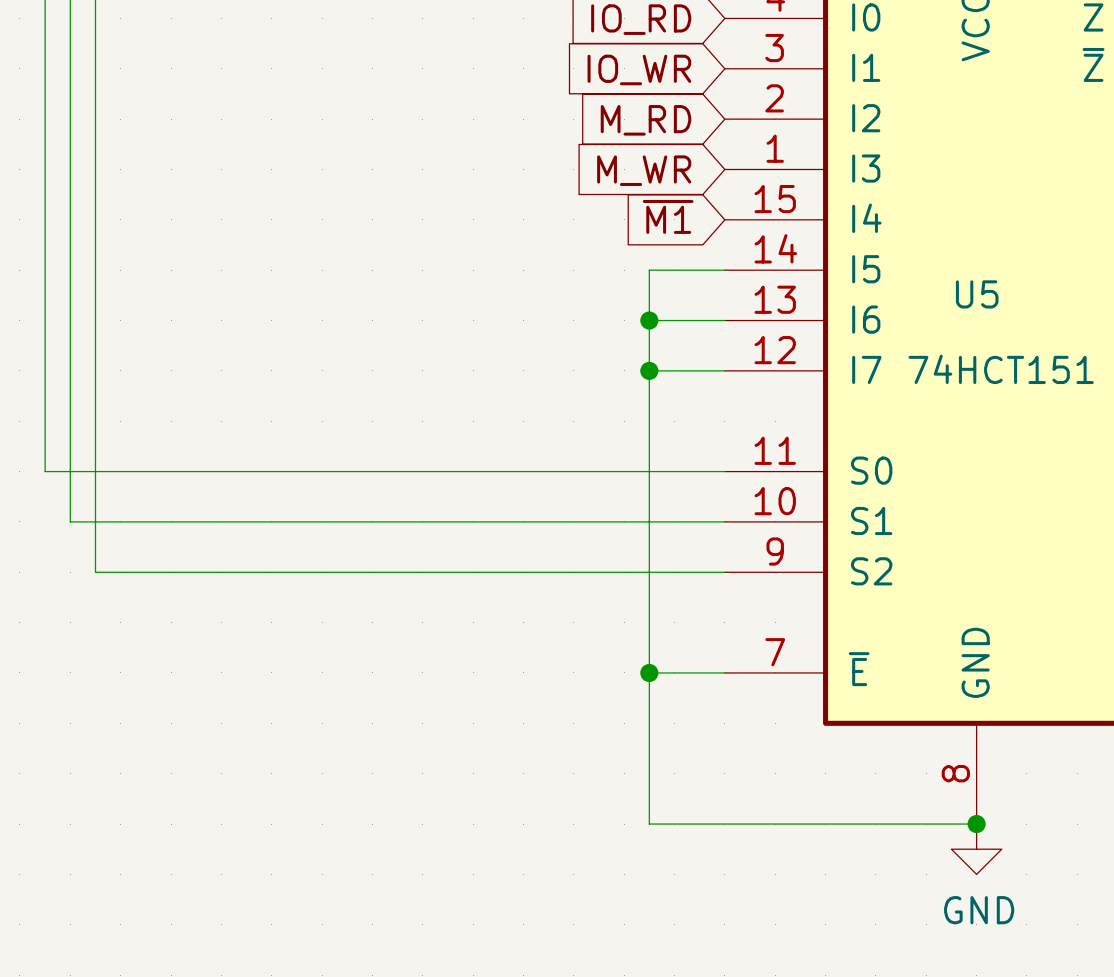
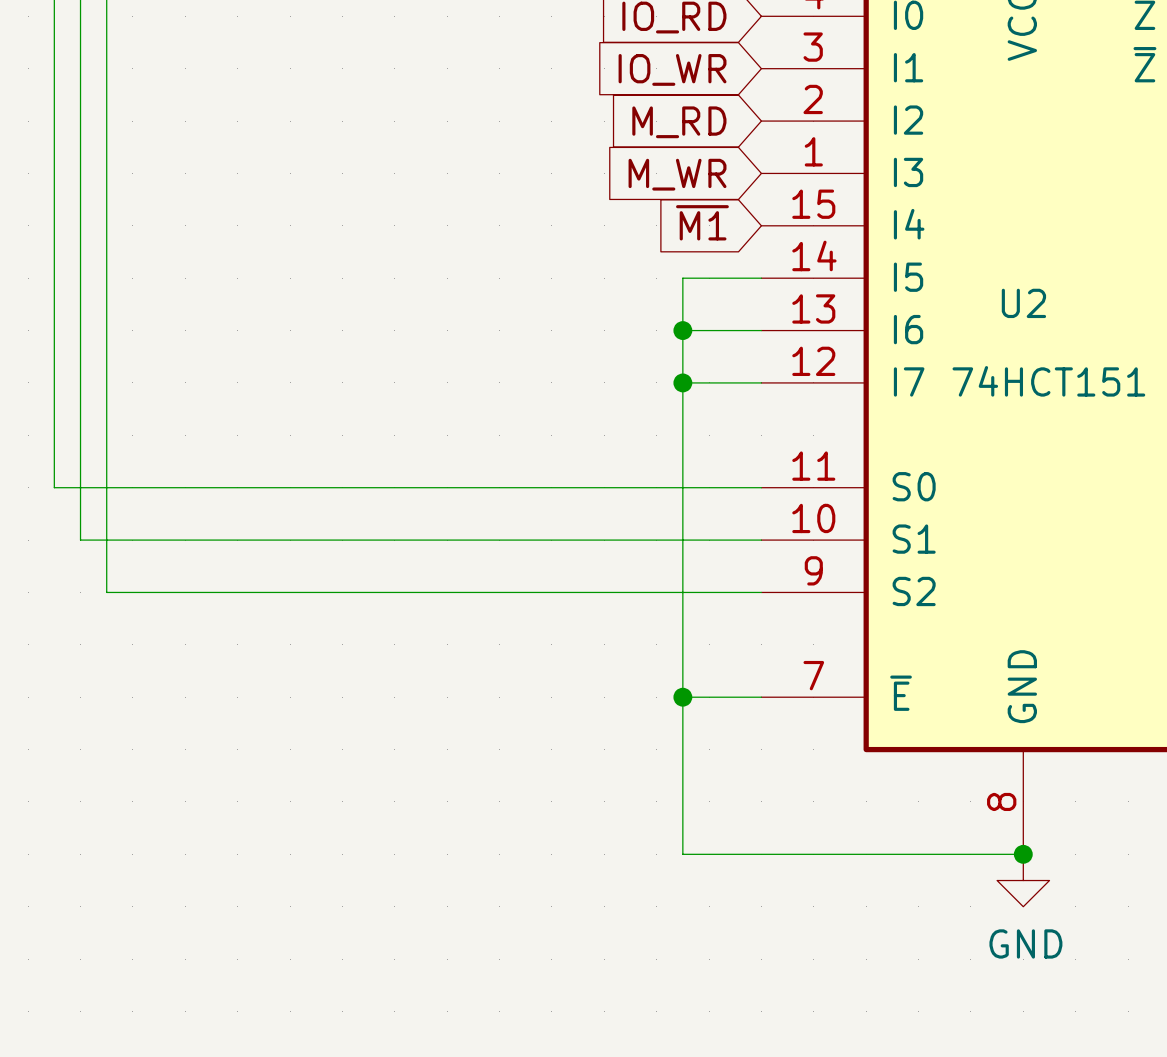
U5 name: U5 (977, 294) -> U2 (1023, 303)

